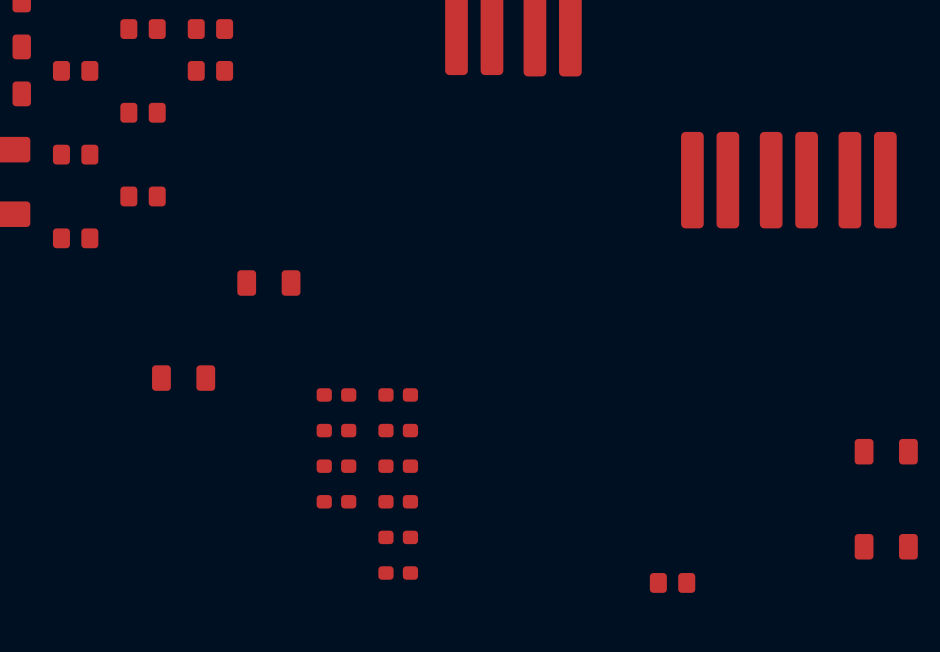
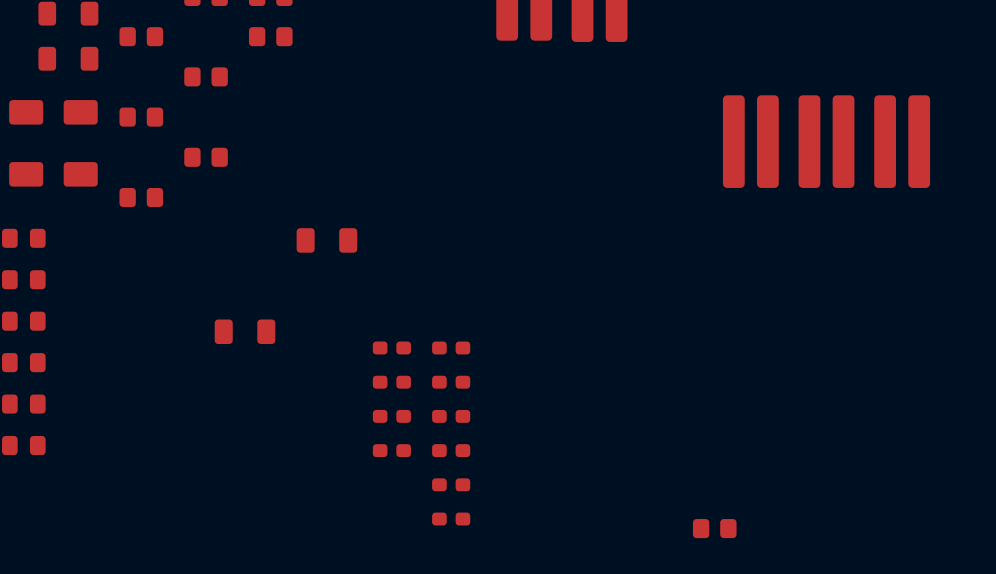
part: (886, 451) -> none
part: (886, 546) -> none

